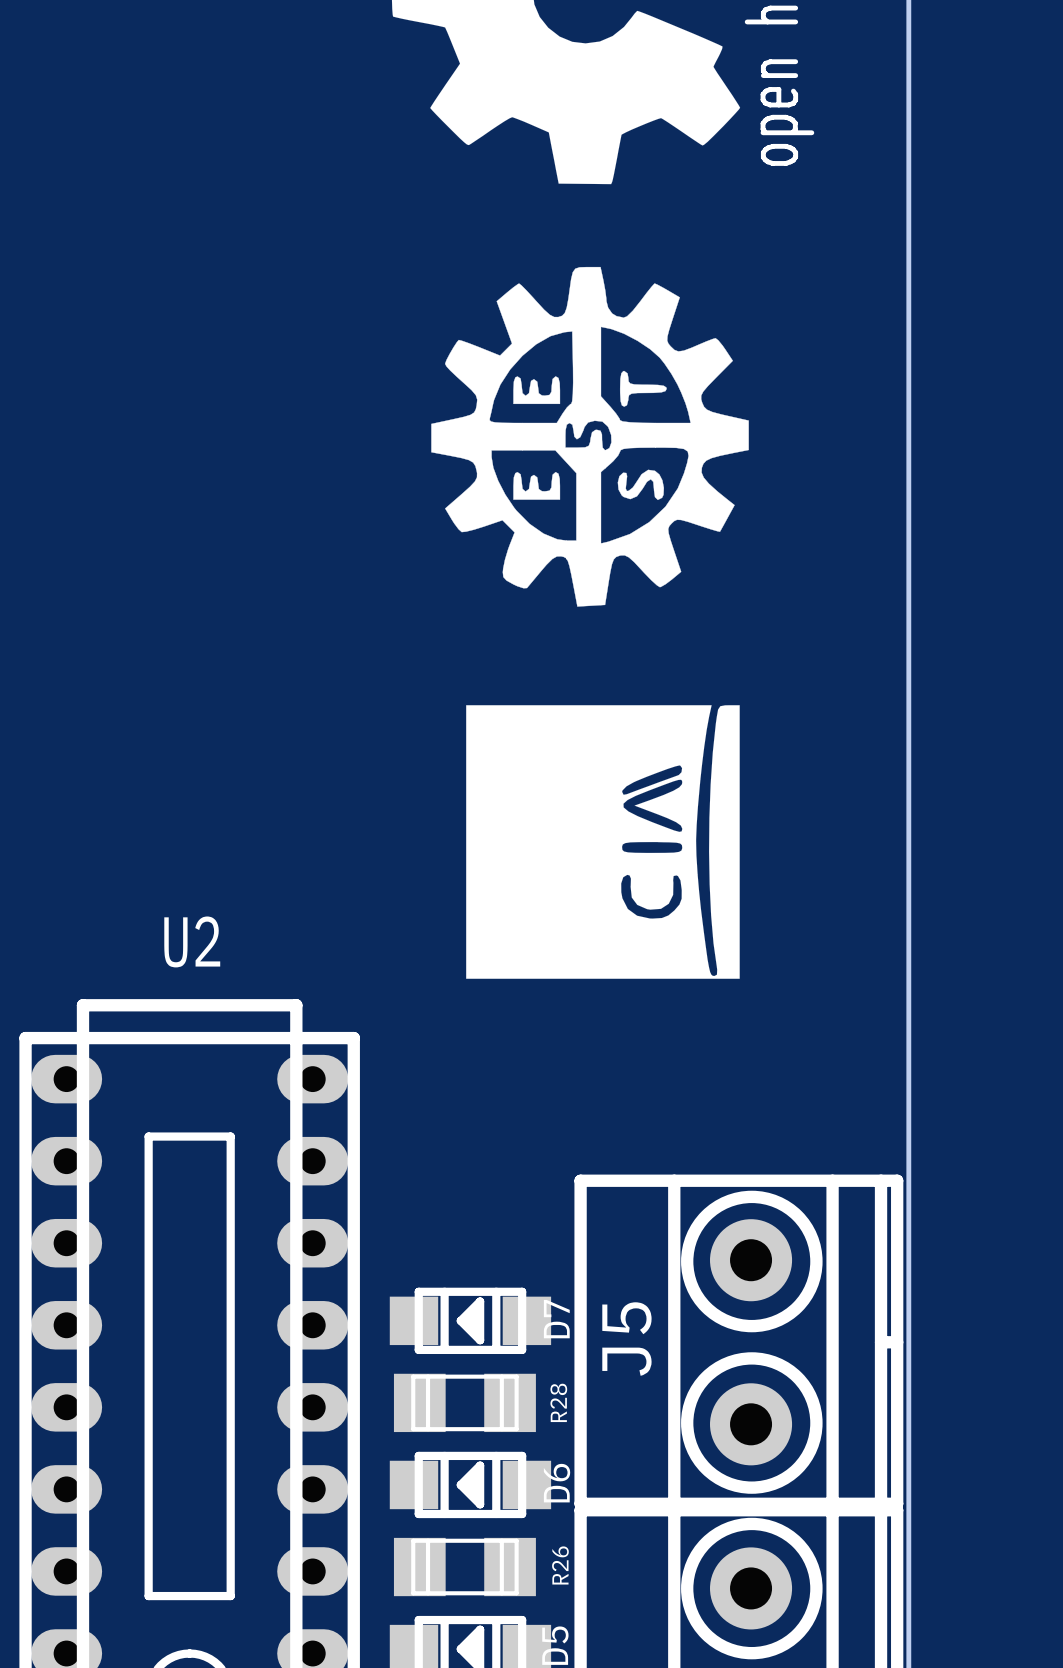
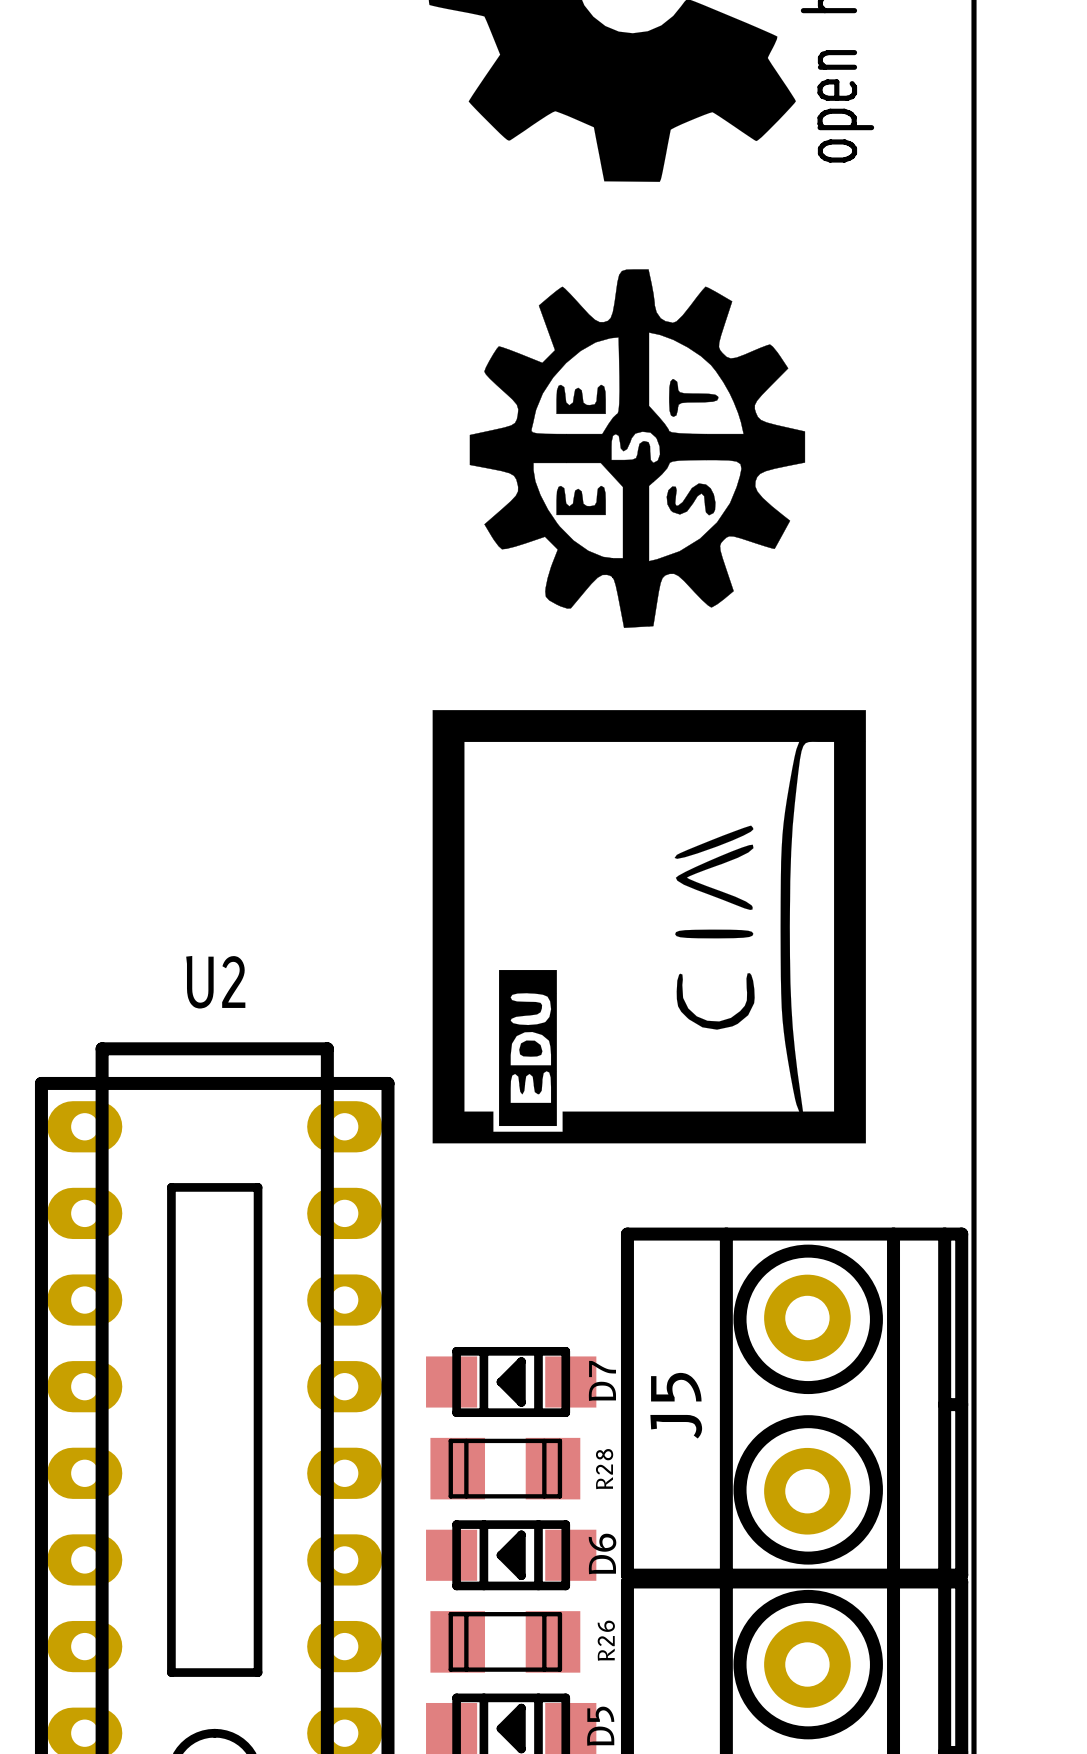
drawing: none -> [432, 710, 866, 1144]
drawing: [466, 705, 740, 979] -> none

